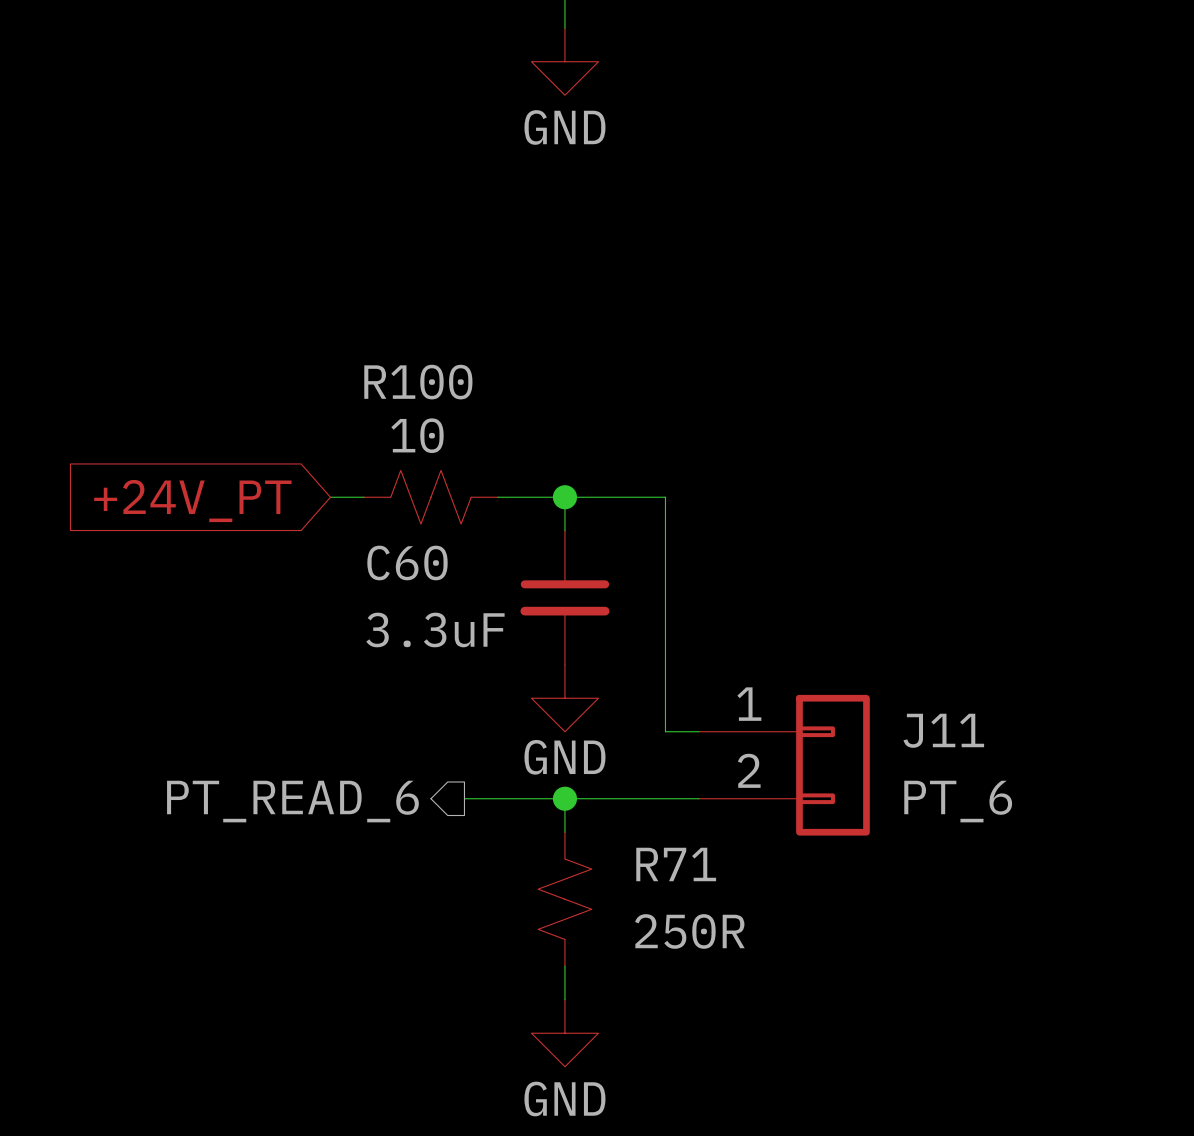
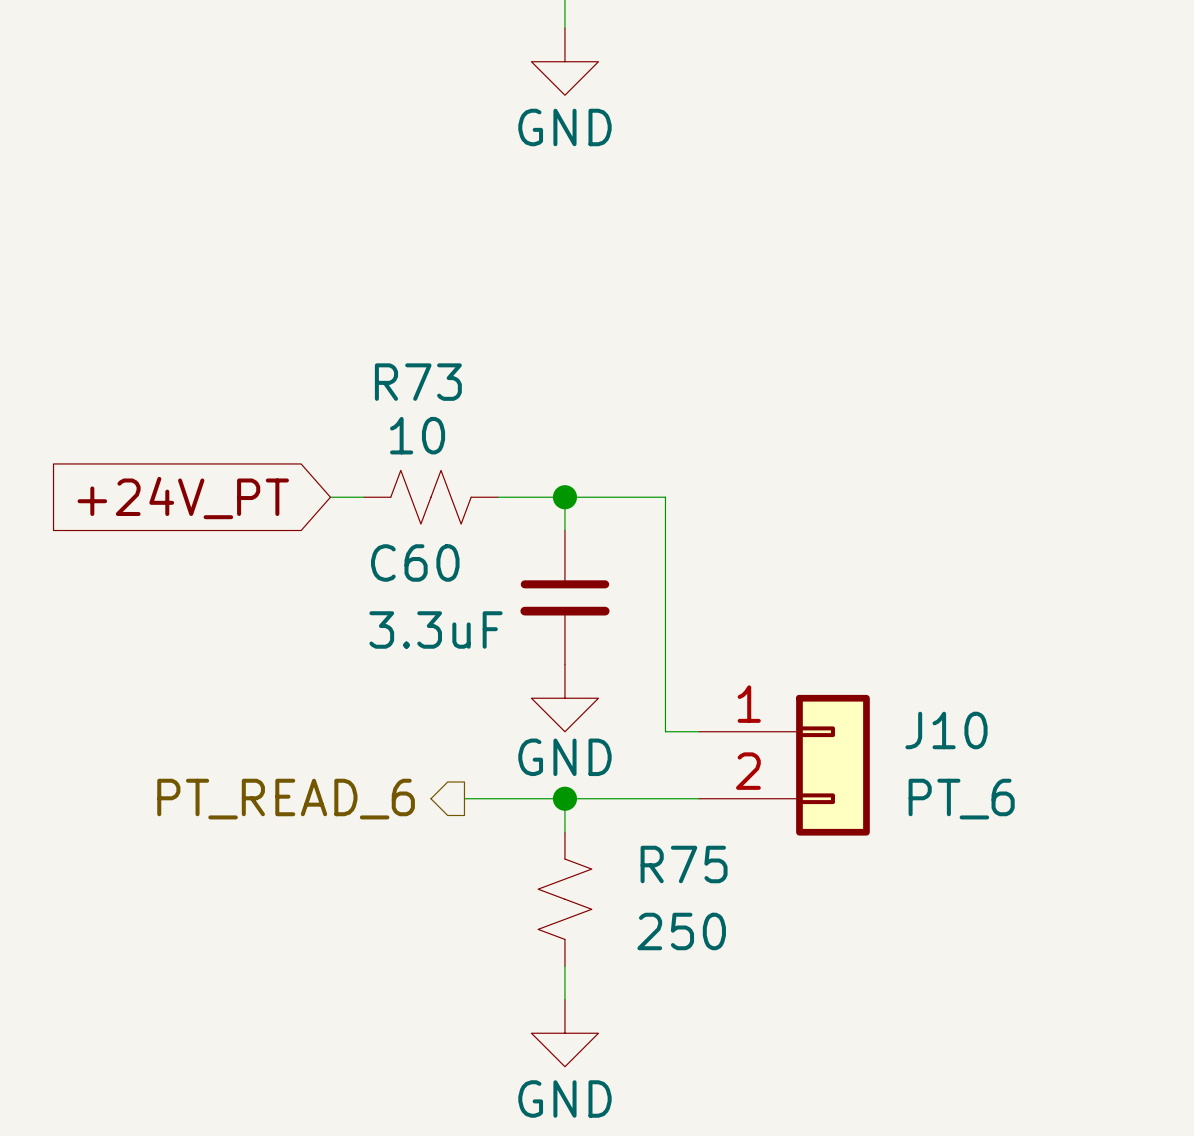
R100 name: R100 (418, 382) -> R73 (418, 382)
J11 name: J11 (943, 730) -> J10 (946, 730)
R71 name: R71 (676, 864) -> R75 (684, 864)
R71 value: 250R (689, 931) -> 250 (681, 931)

